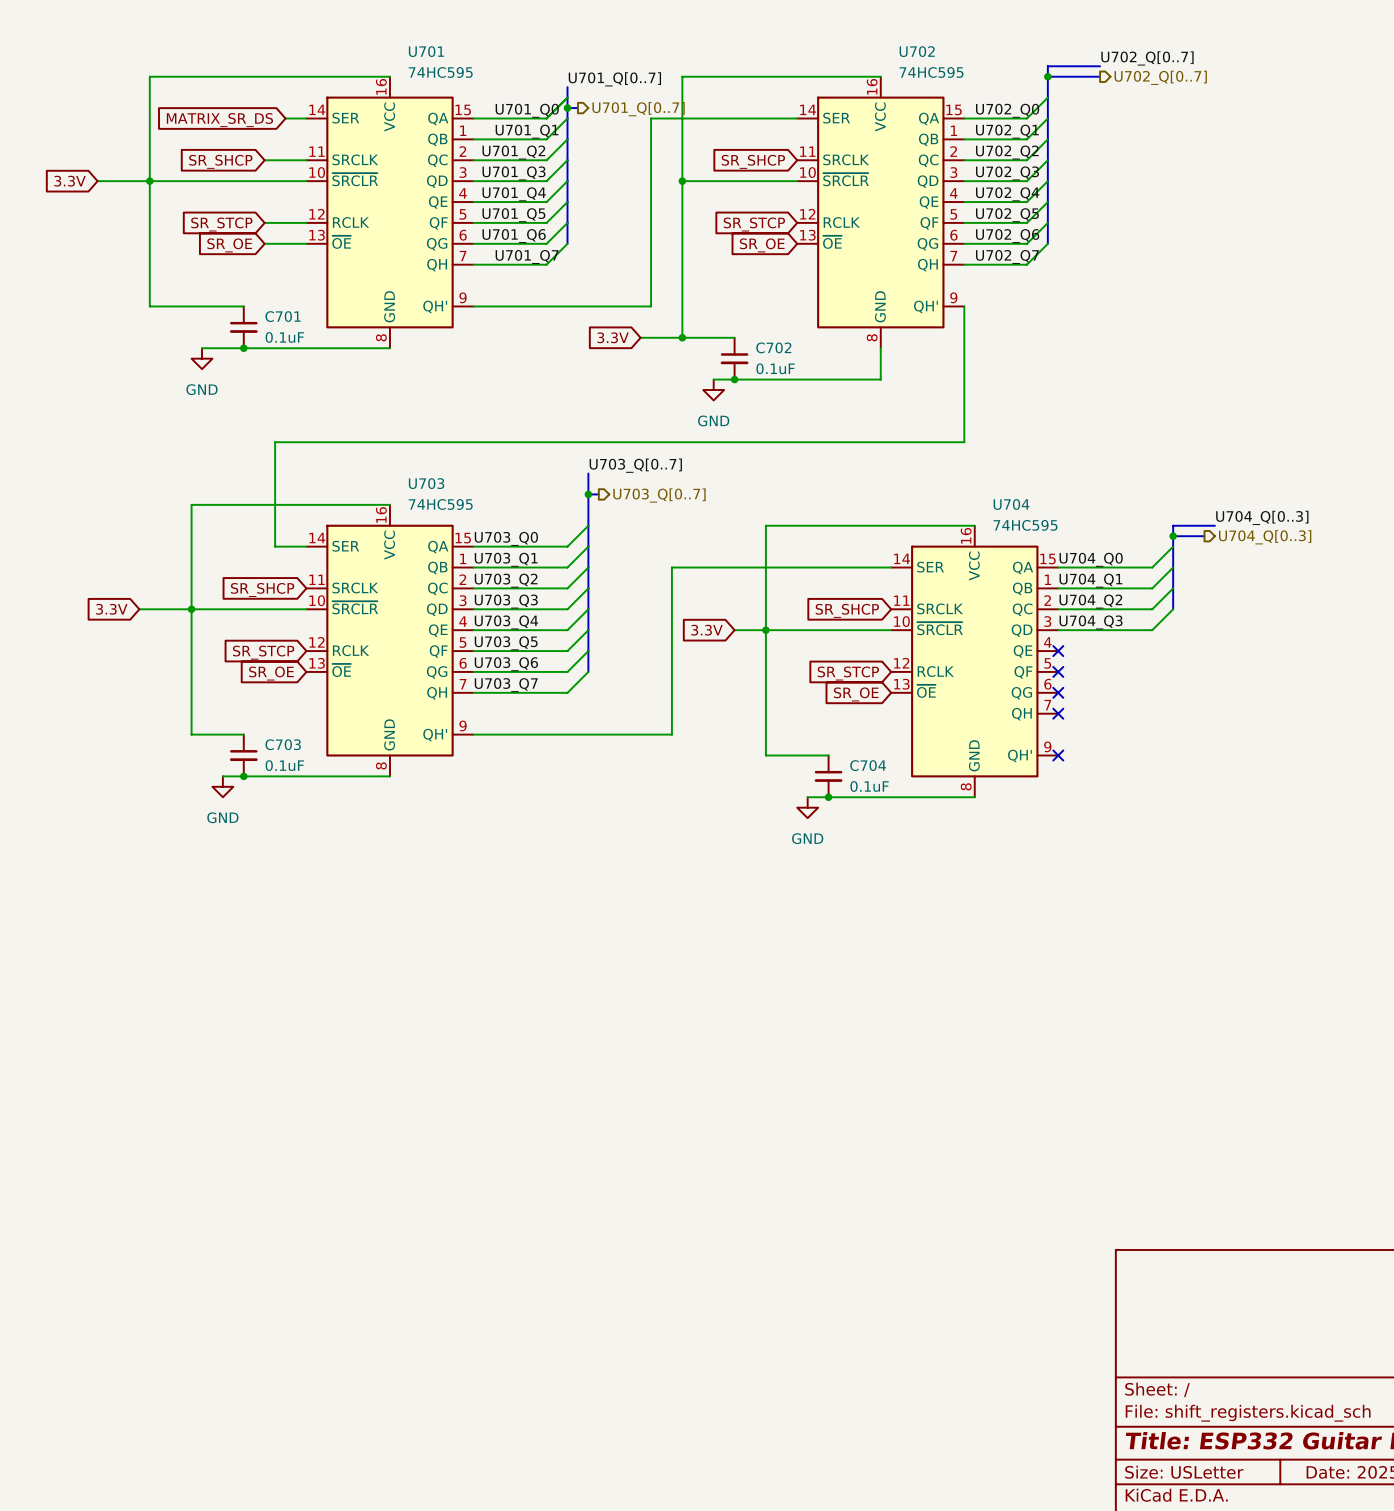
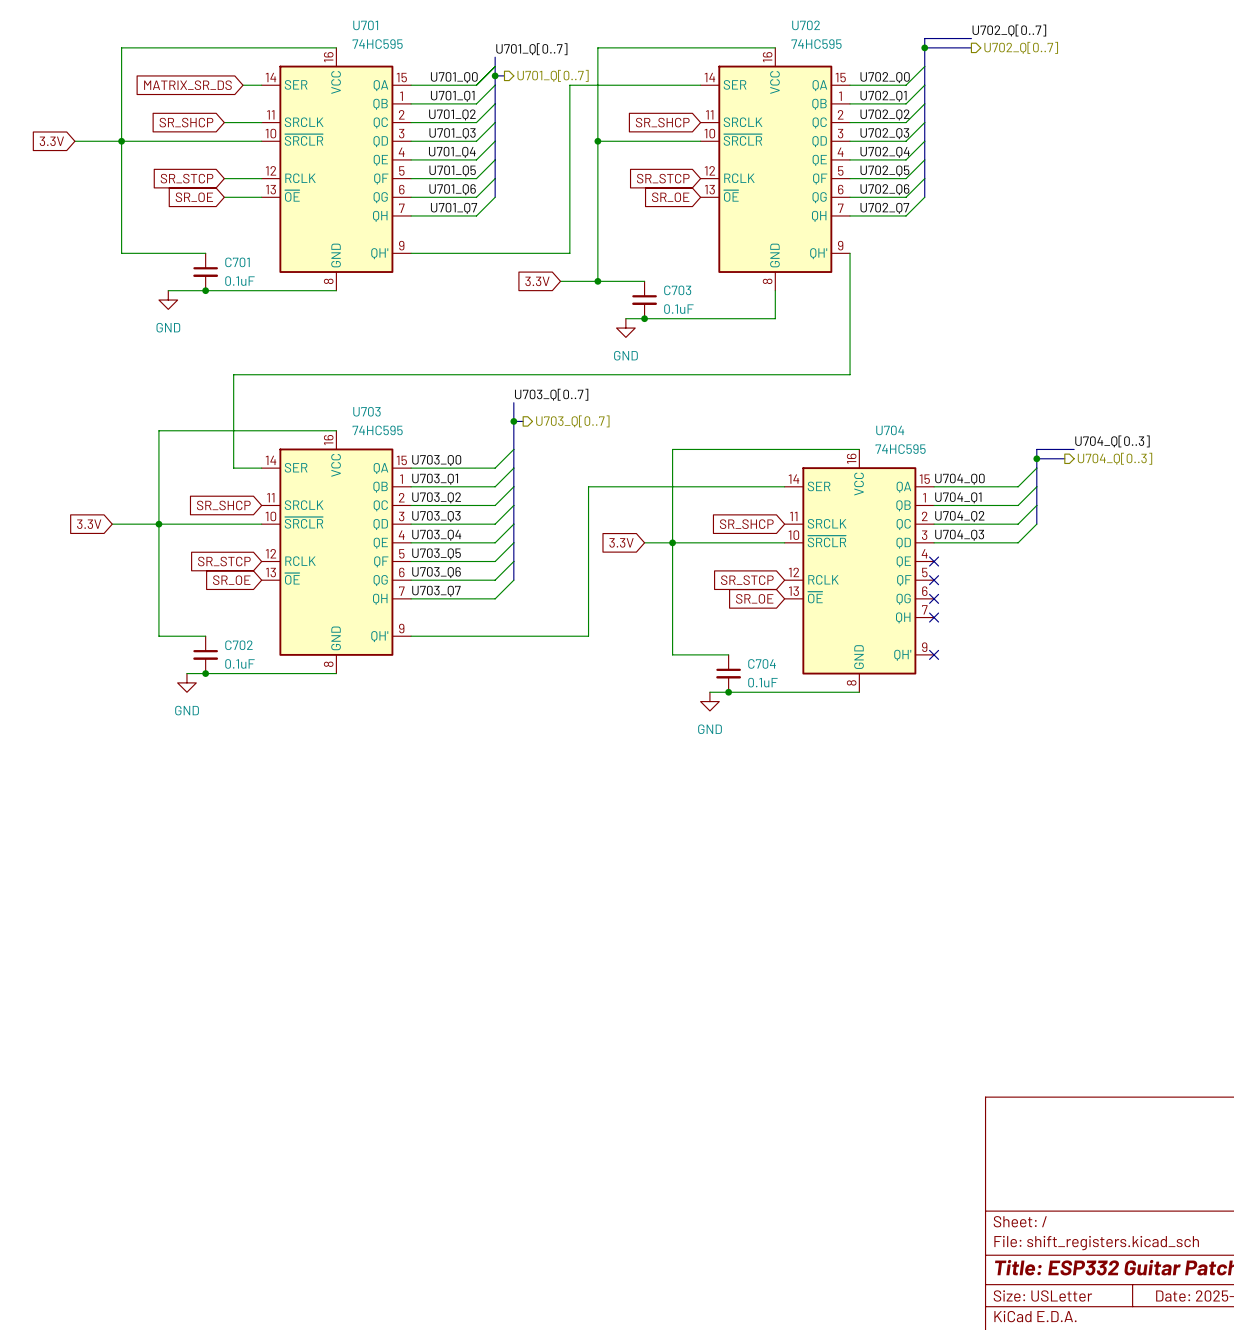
C702 name: C702 (773, 347) -> C703 (677, 290)
C703 name: C703 (283, 744) -> C702 (238, 645)

